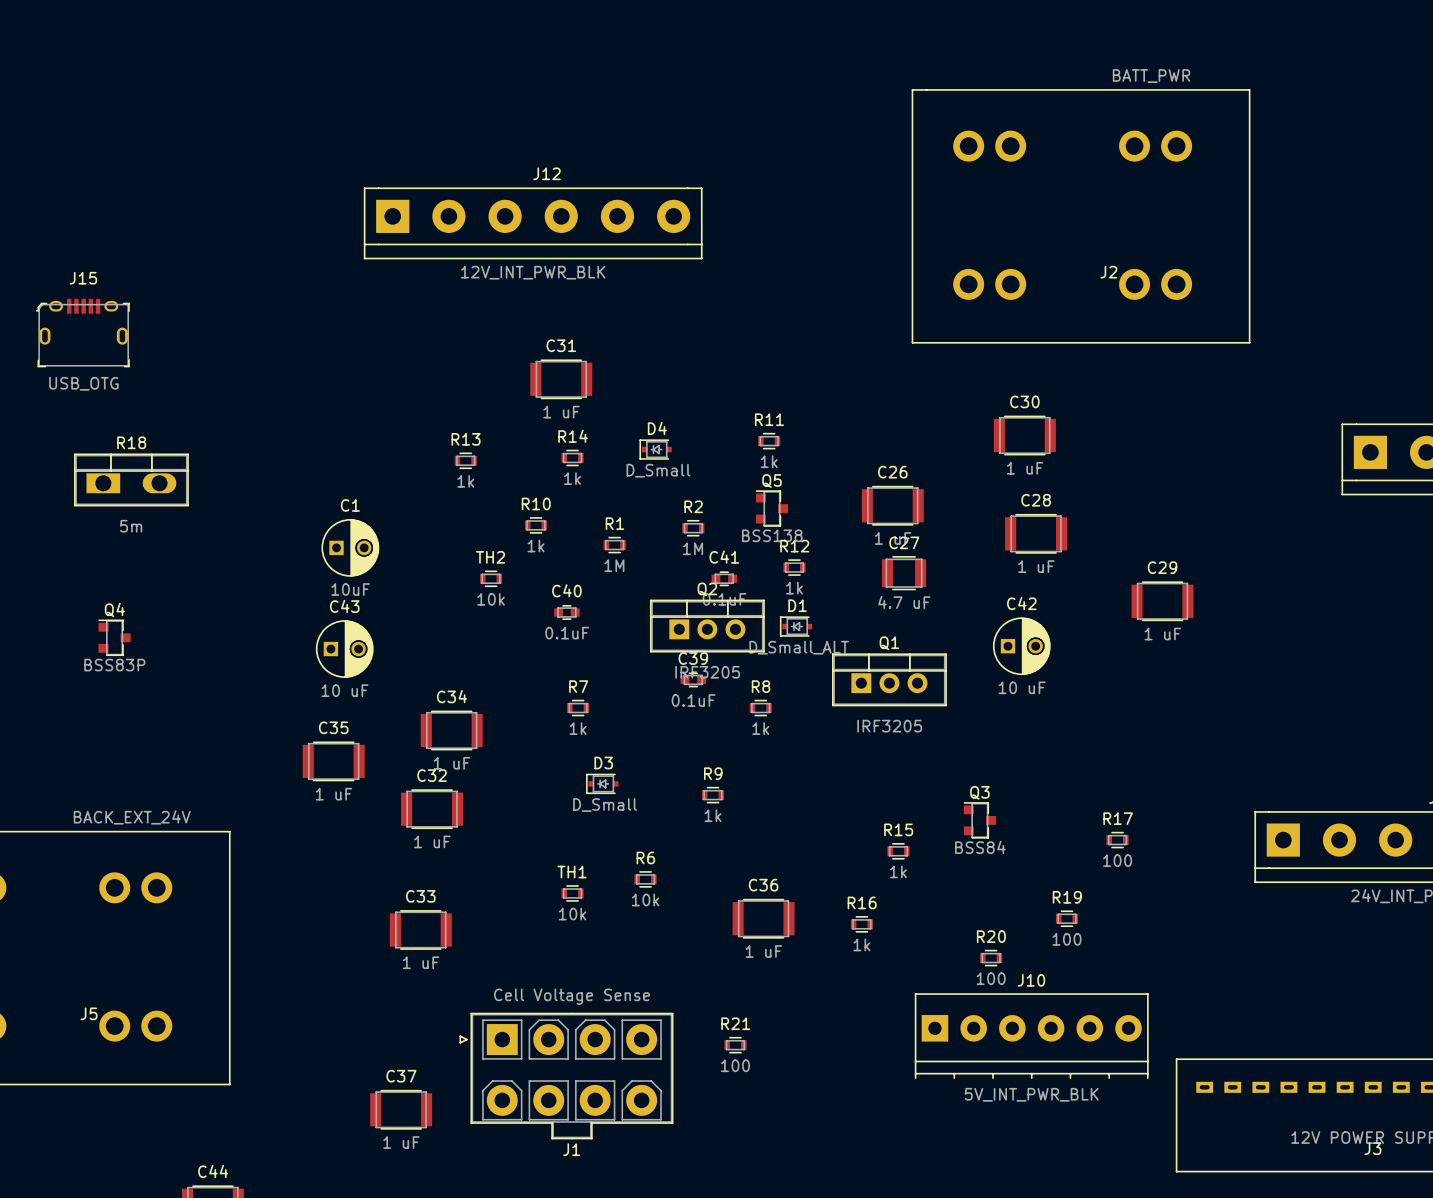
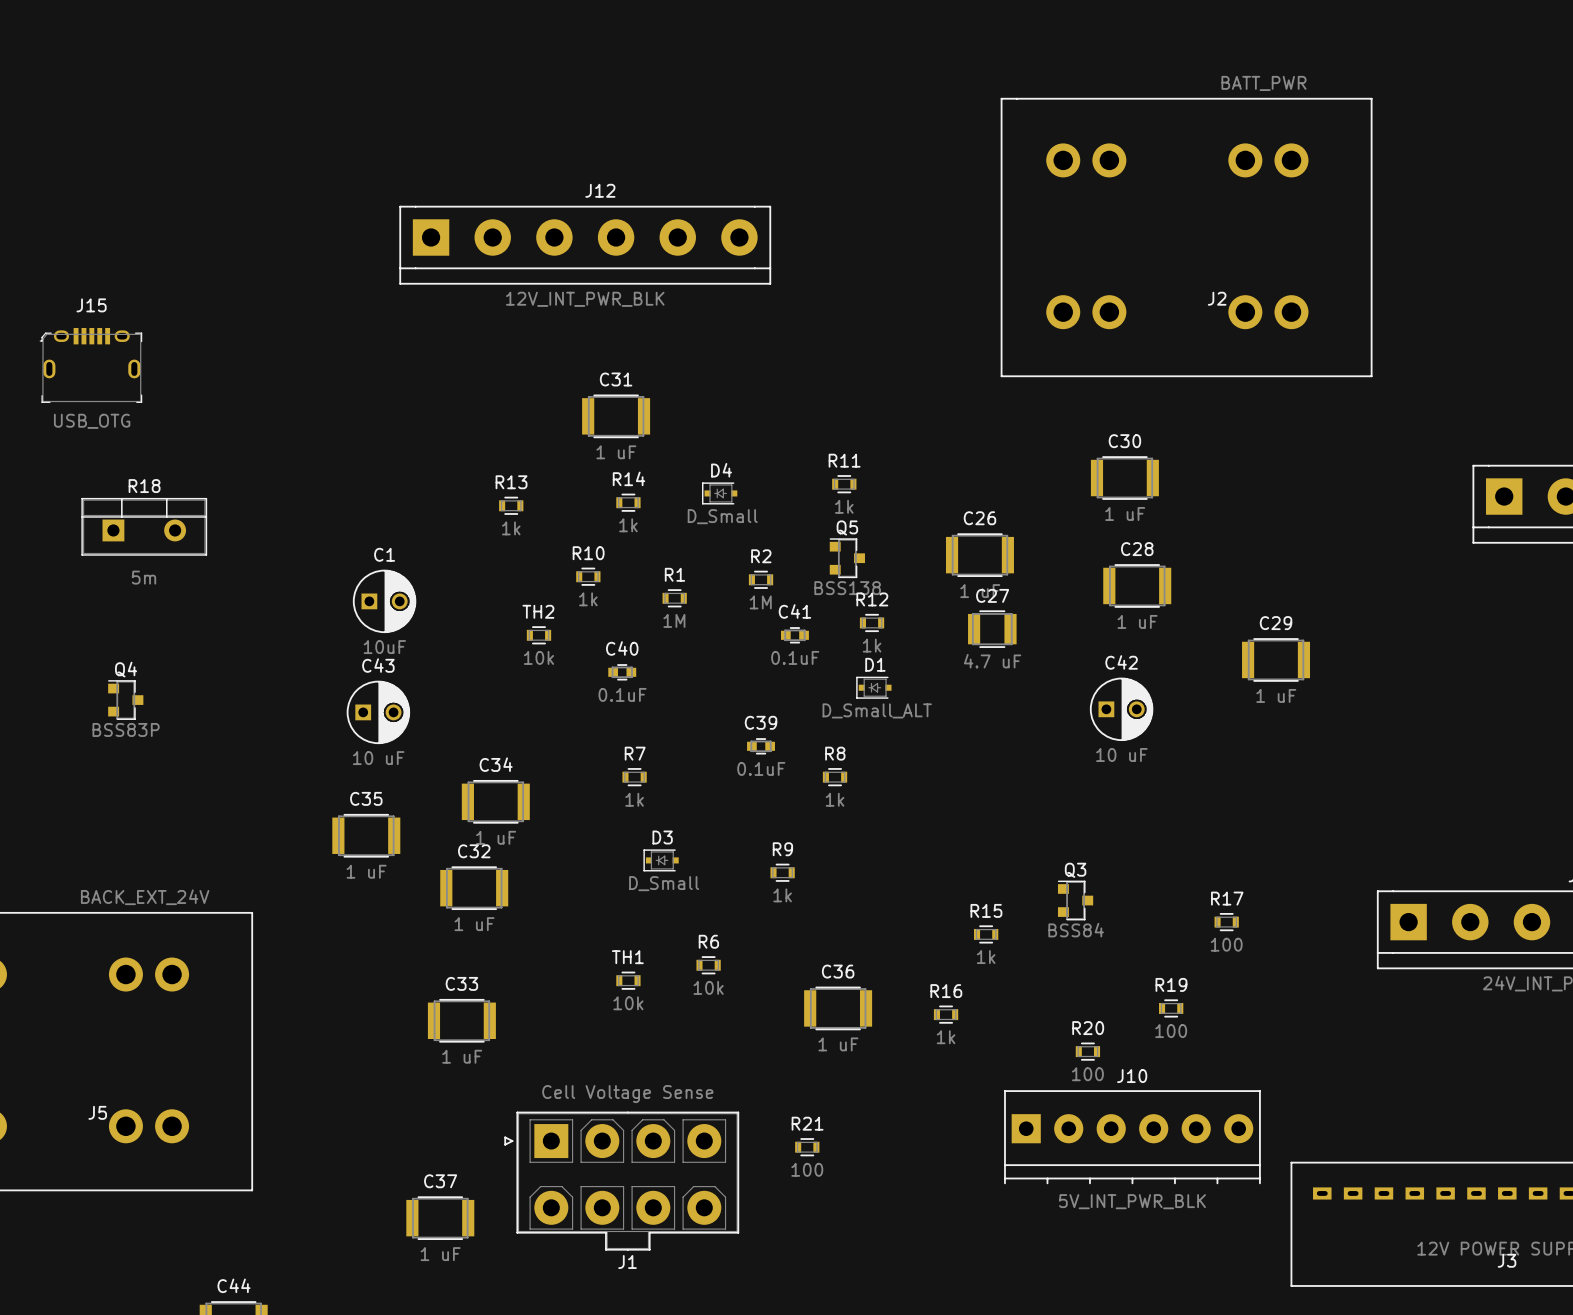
R18 footprint: [74, 453, 189, 507] -> [81, 497, 208, 556]
Q2: IRF3205 (707, 626) -> none
Q1: IRF3205 (889, 679) -> none

